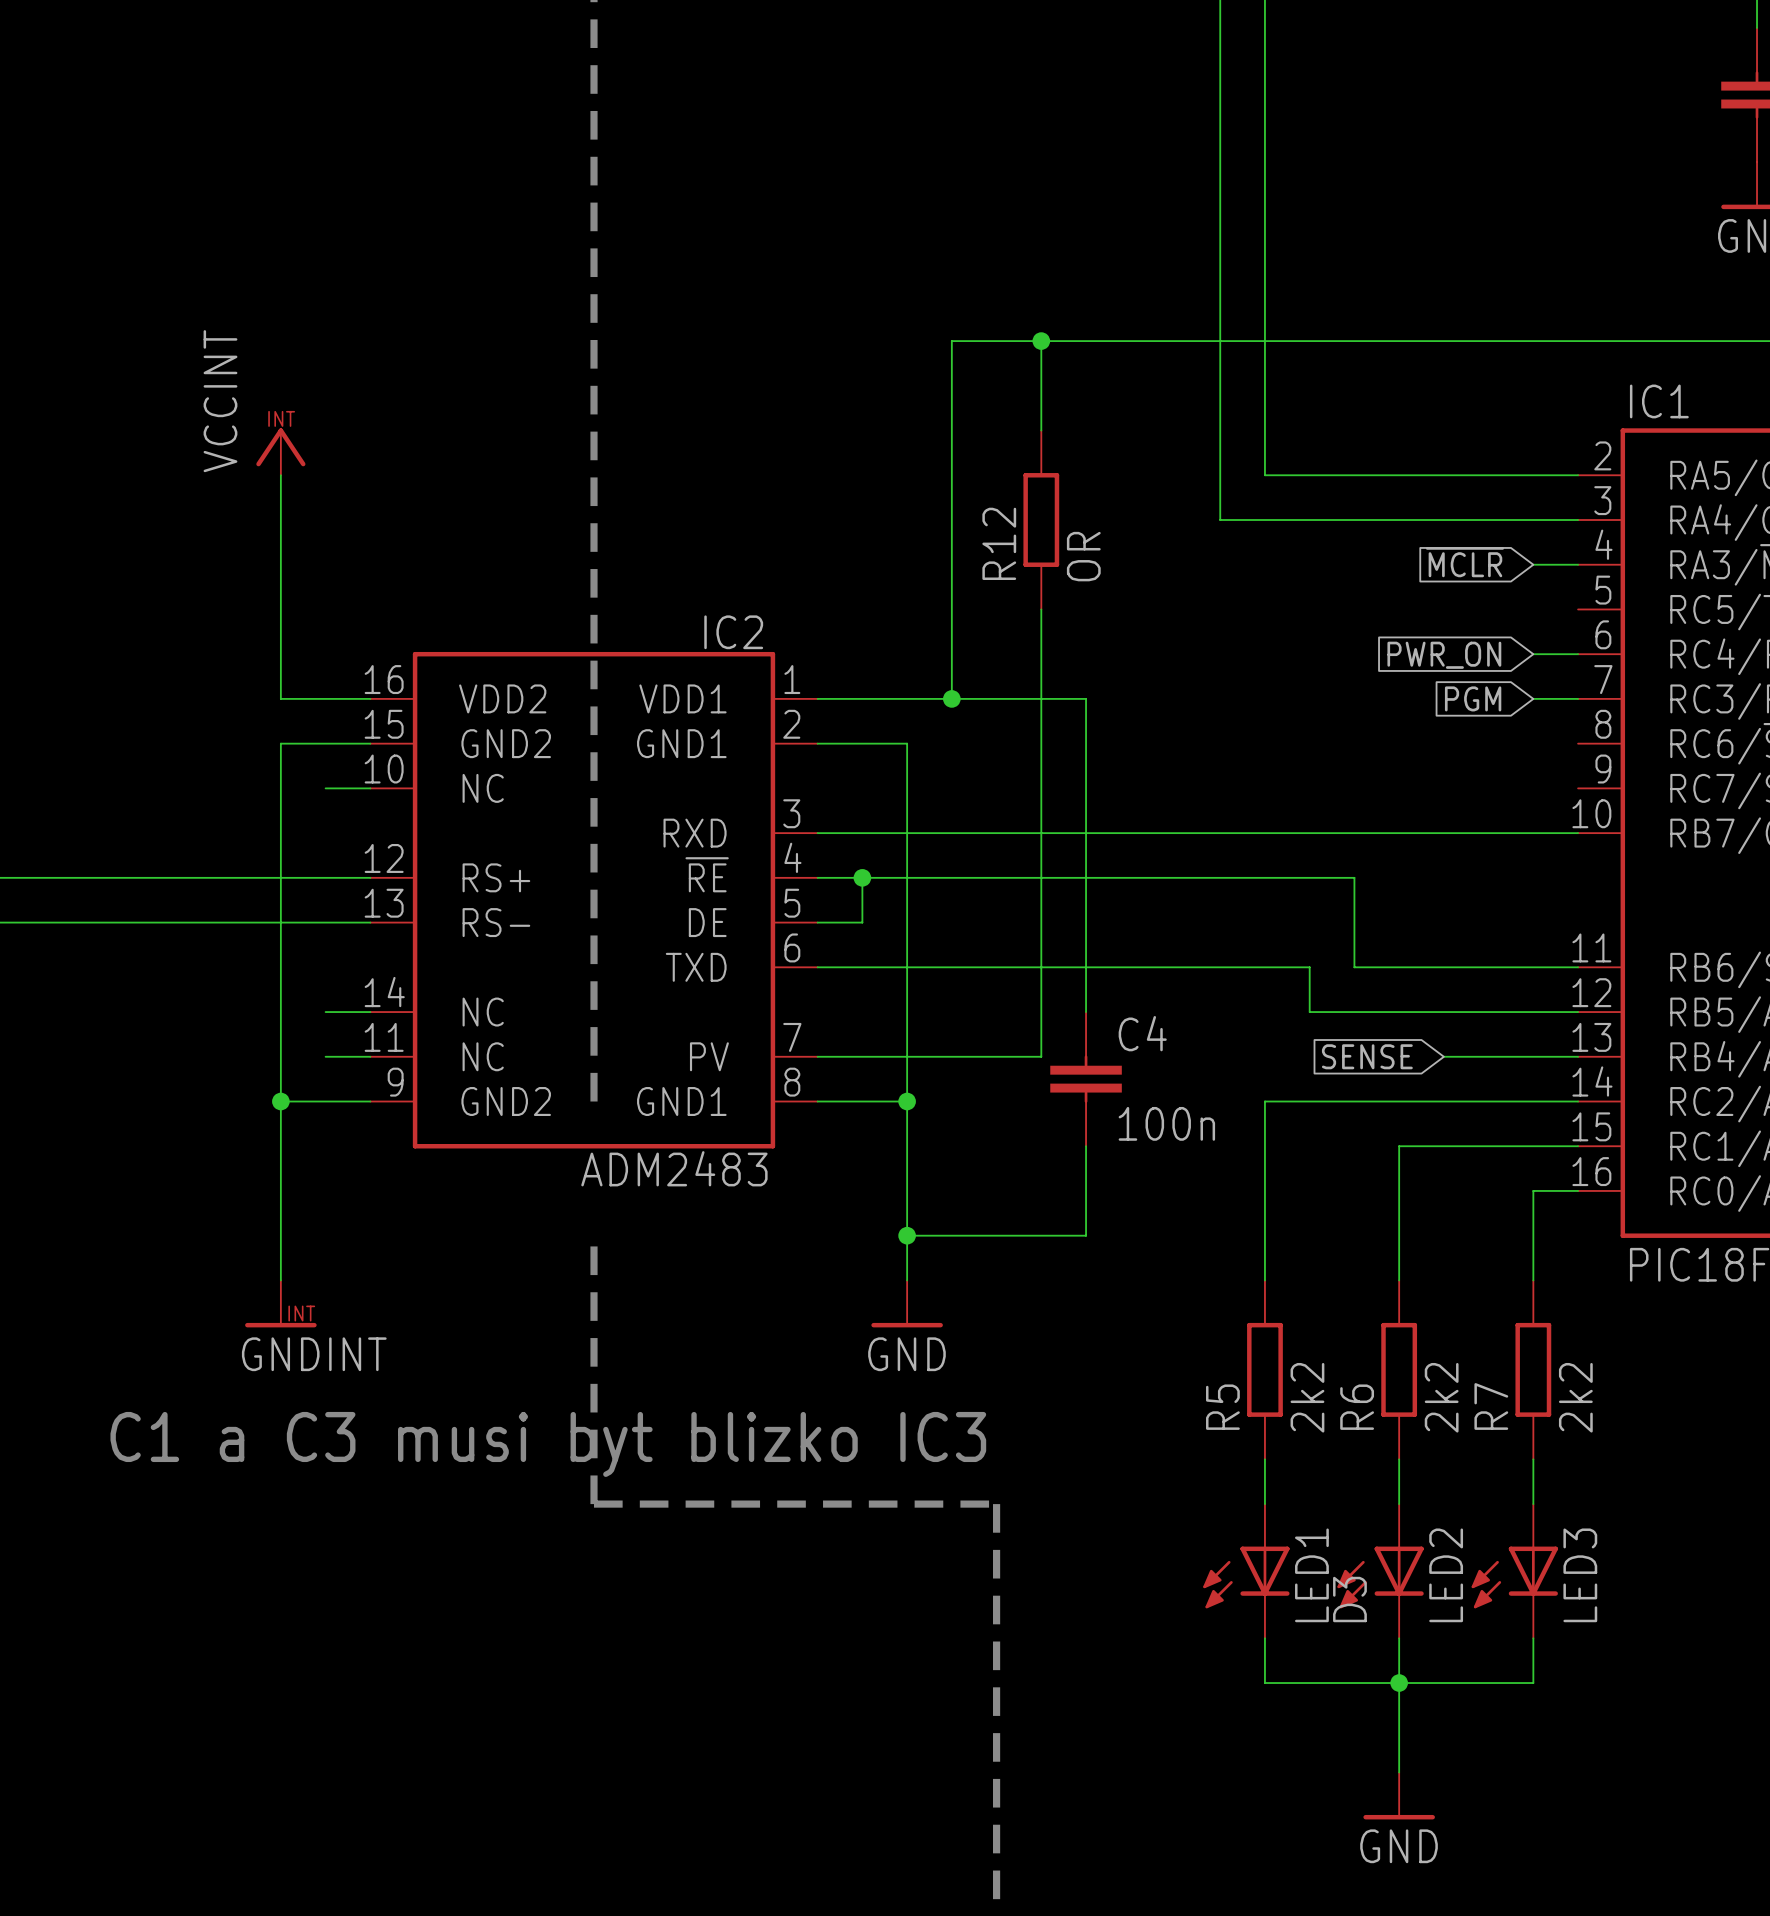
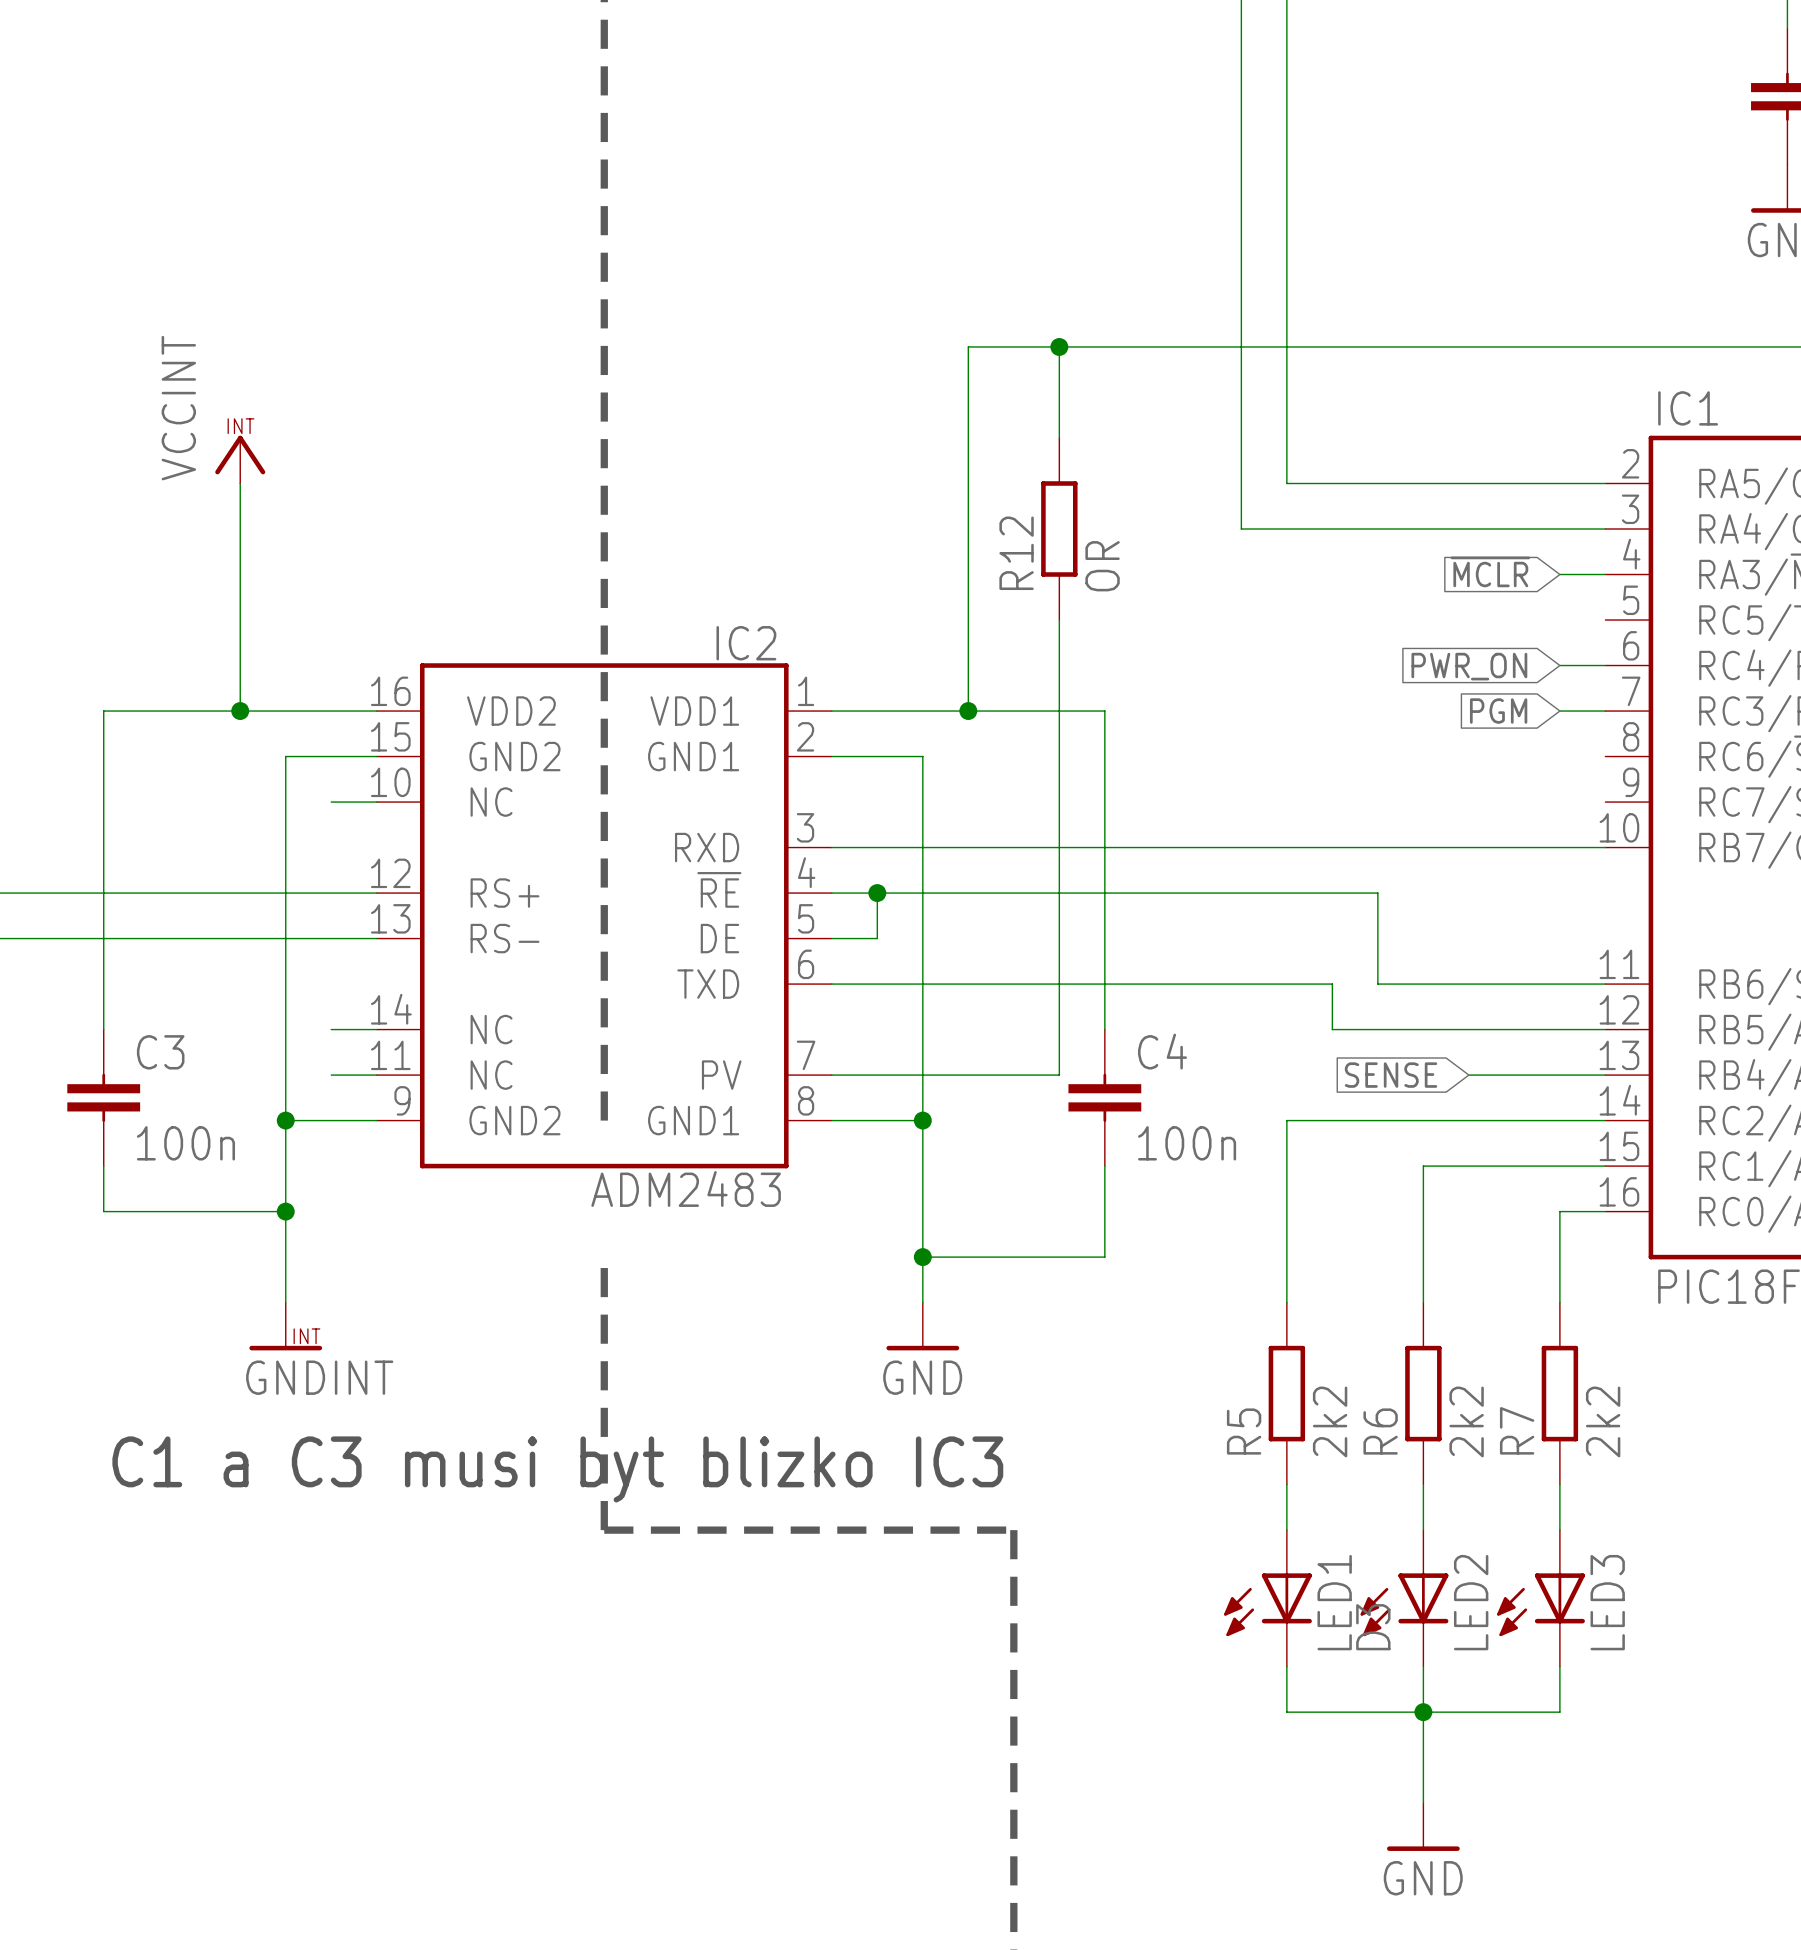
power symbol position: VCCINT (280, 451) -> VCCINT (240, 459)
wire: none -> (240, 483) (240, 711)
wire: (280, 475) (280, 698) -> (103, 1029) (103, 711) (285, 711)
junction: none -> (240, 711)
C3: none -> 100n (103, 1097)
wire: none -> (103, 1166) (103, 1211) (285, 1211)
junction: none -> (285, 1211)

